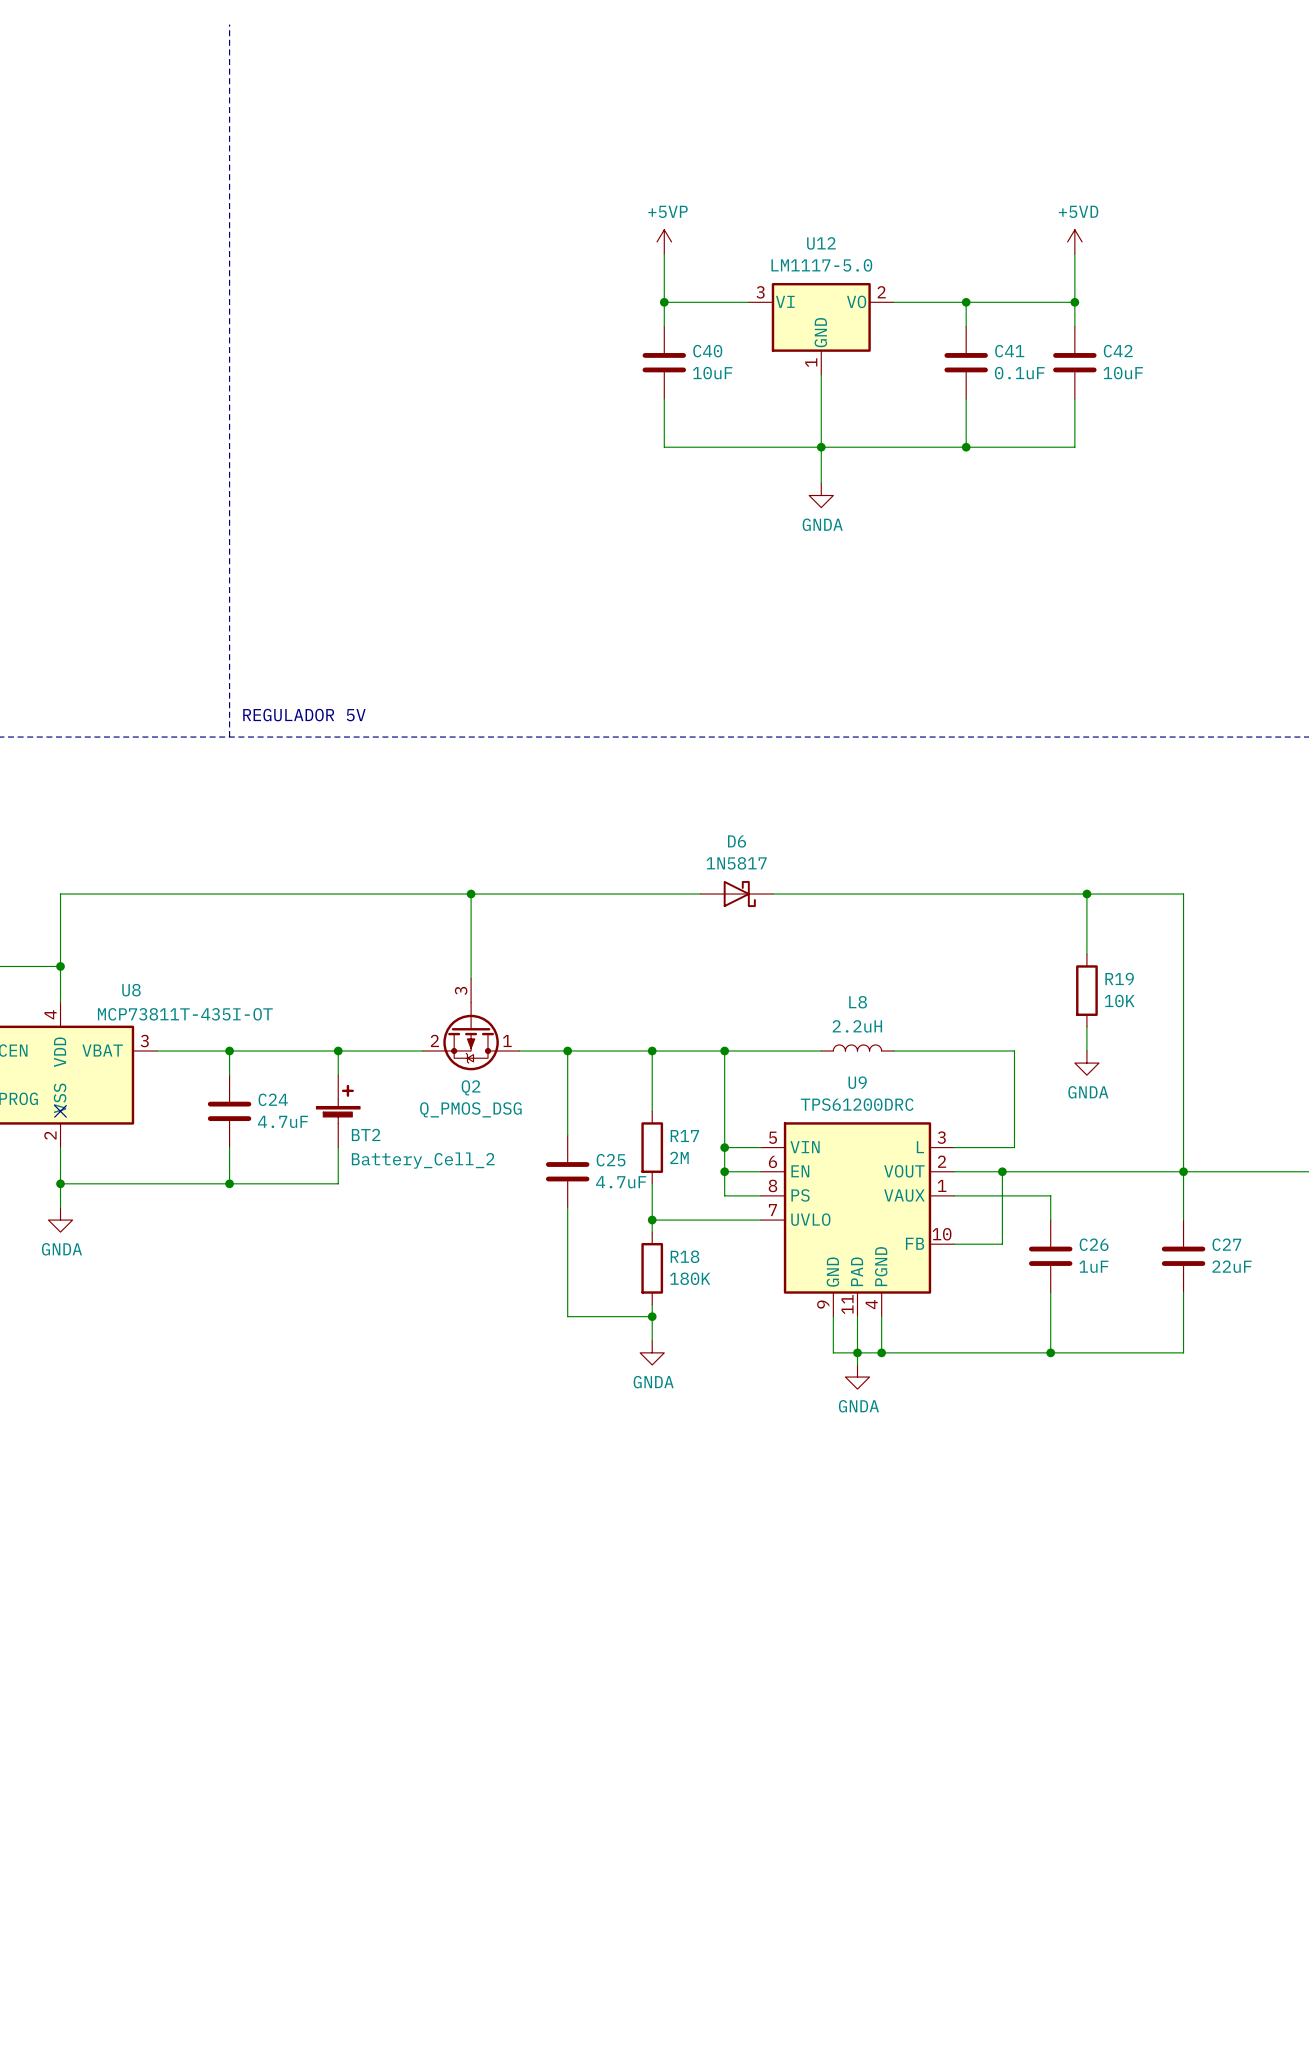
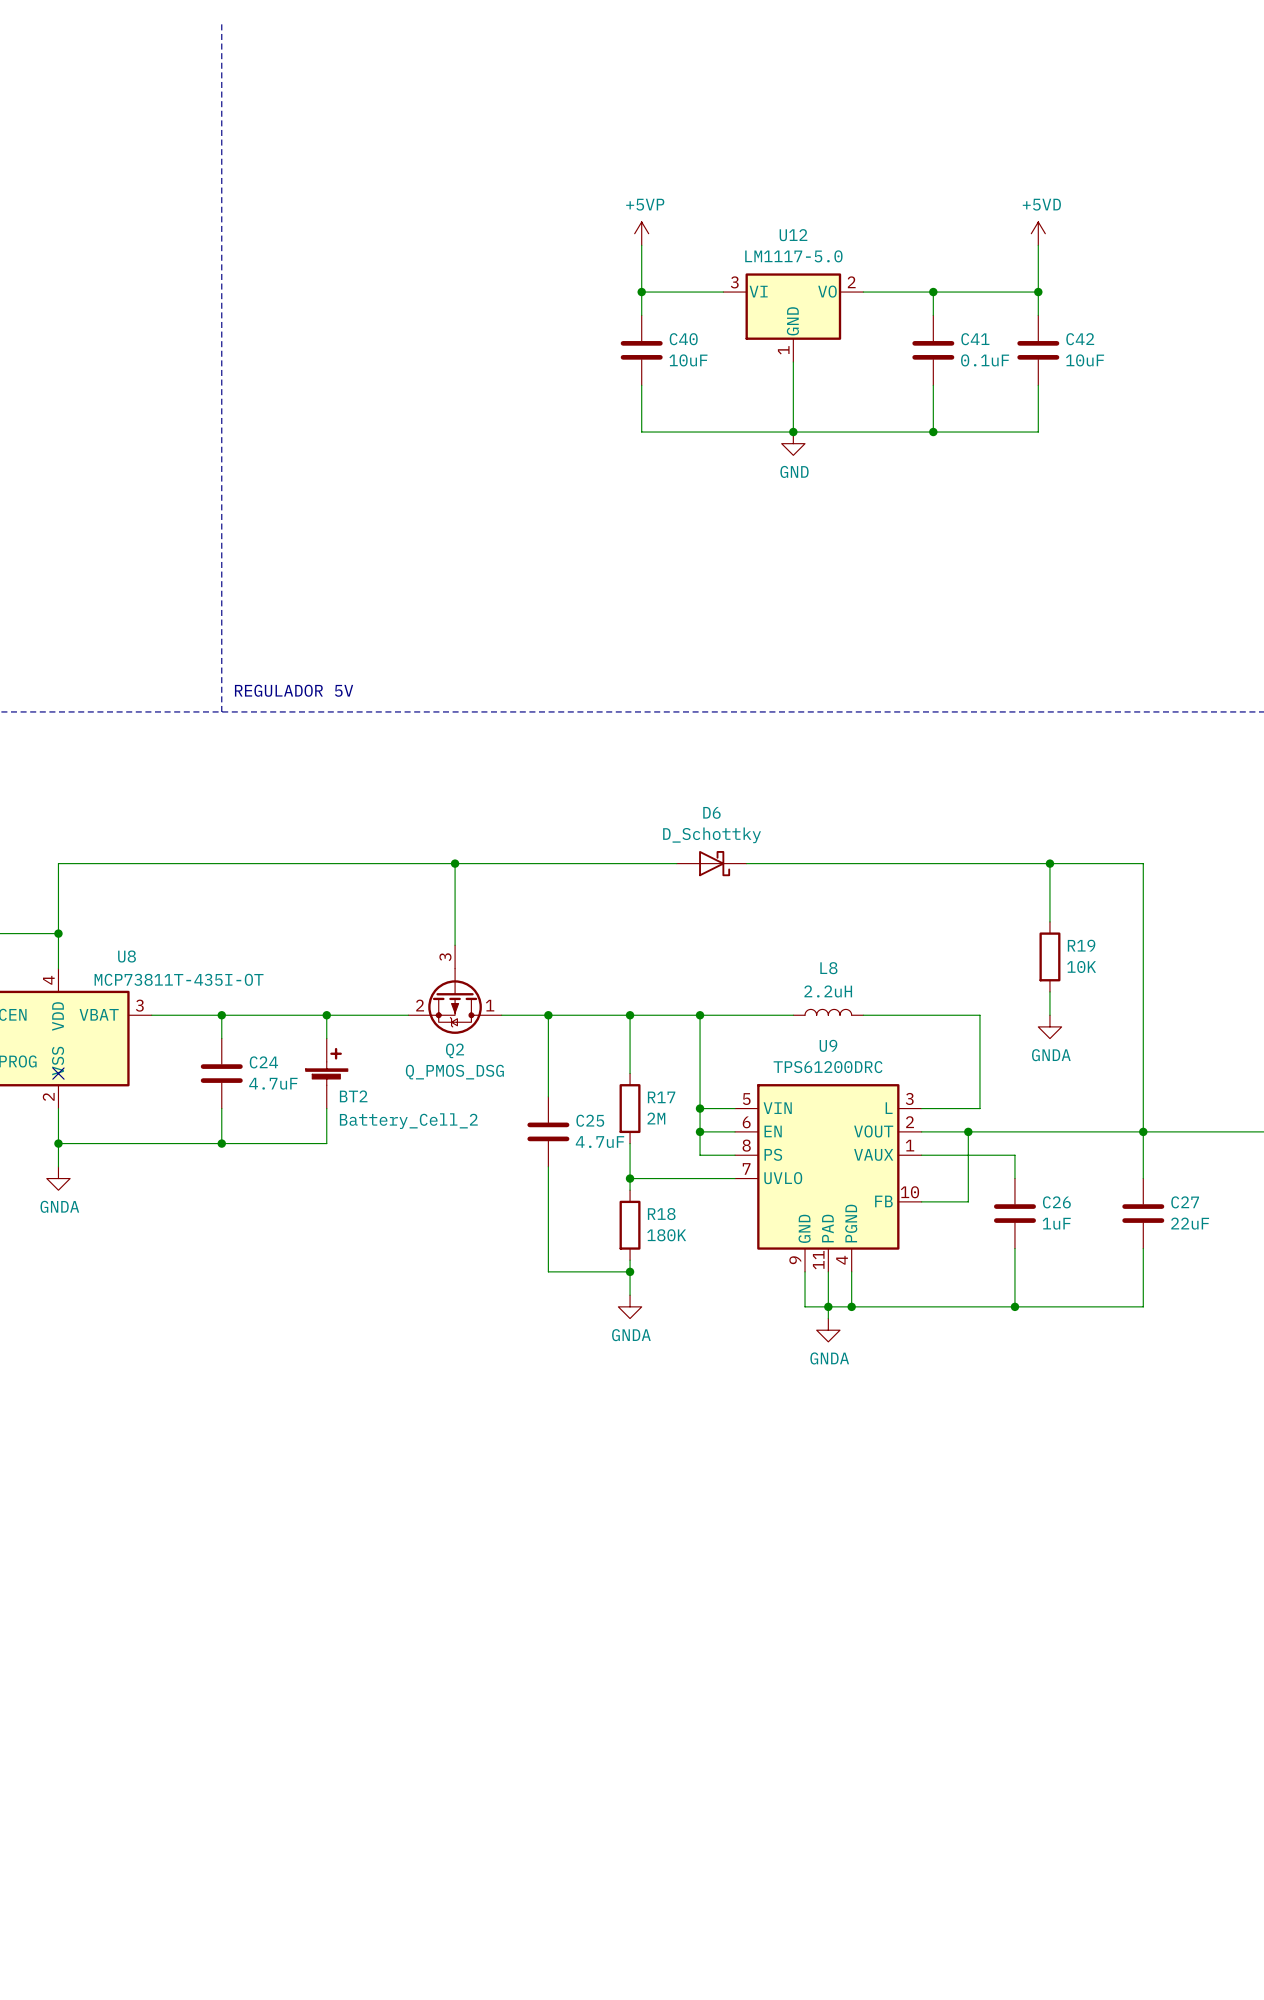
wire: (821, 447) (821, 483) -> none
power symbol: none -> GND (793, 443)
power symbol: GNDA (821, 495) -> none
D6 value: 1N5817 (736, 863) -> D_Schottky (712, 835)

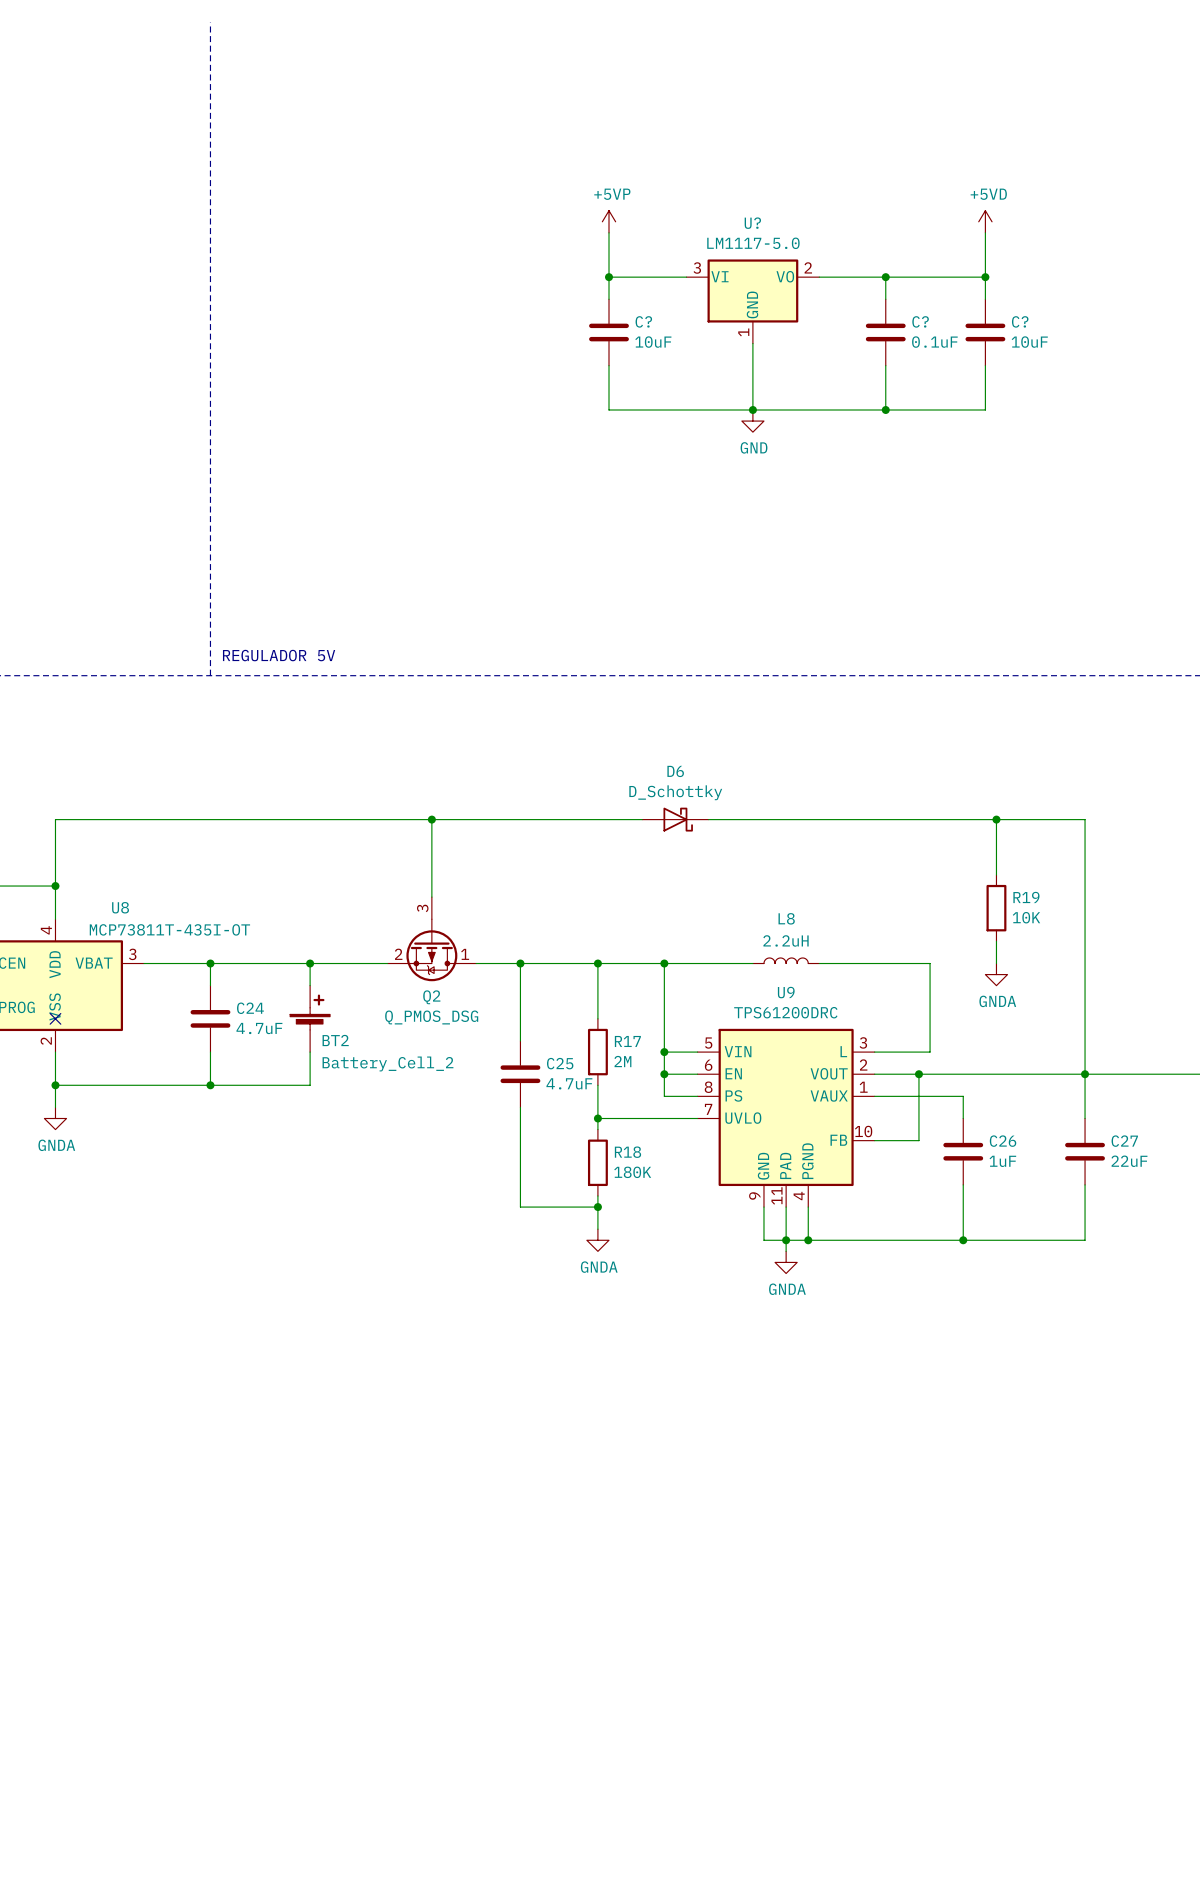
U12 name: U12 (793, 235) -> U? (752, 223)
C40 name: C40 (683, 339) -> C? (643, 321)
C41 name: C41 (975, 339) -> C? (920, 321)
C42 name: C42 (1080, 339) -> C? (1020, 321)

